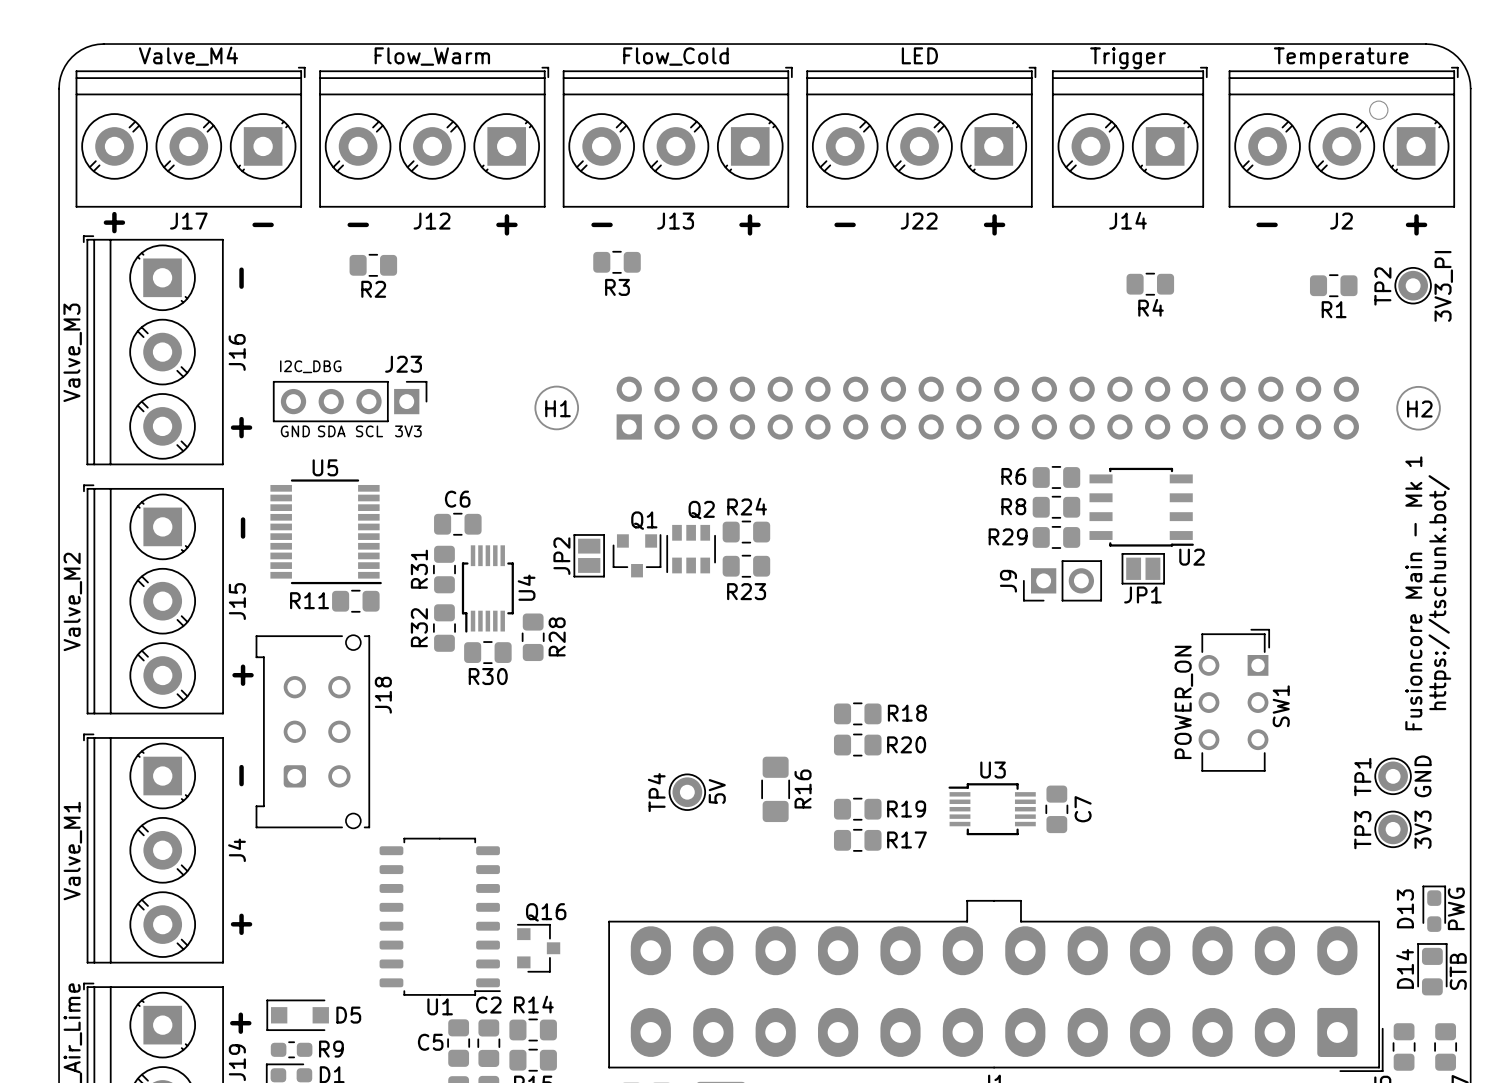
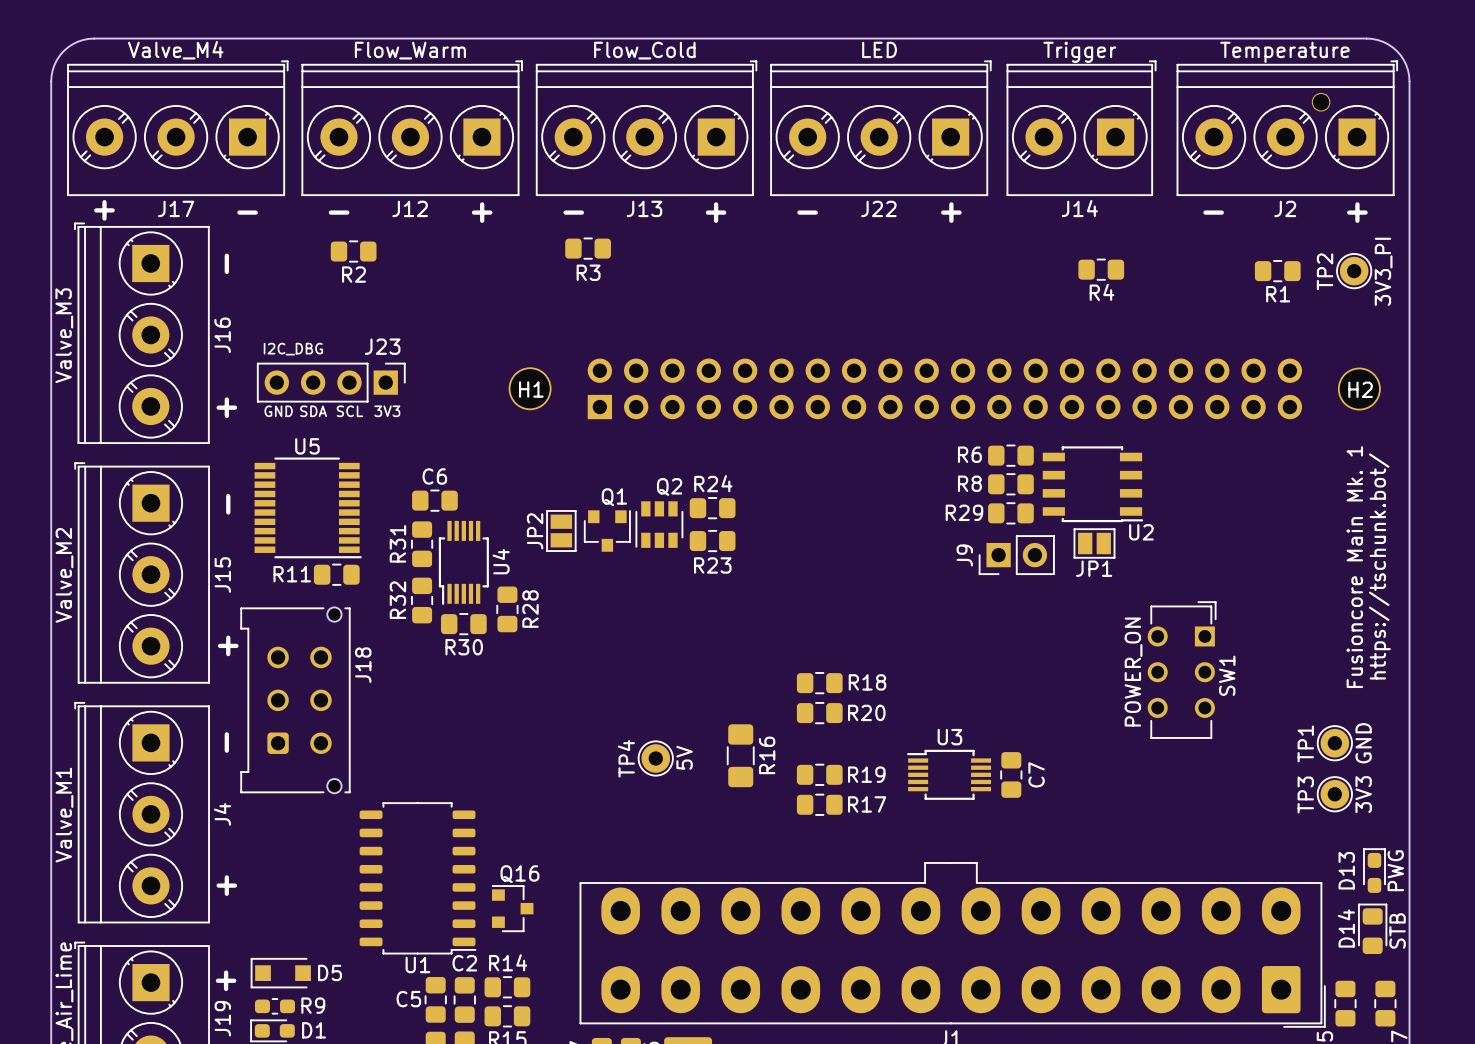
text: Fusioncore Main - Mk 1 (1413, 593) -> Fusioncore Main Mk. 1 (1354, 567)

